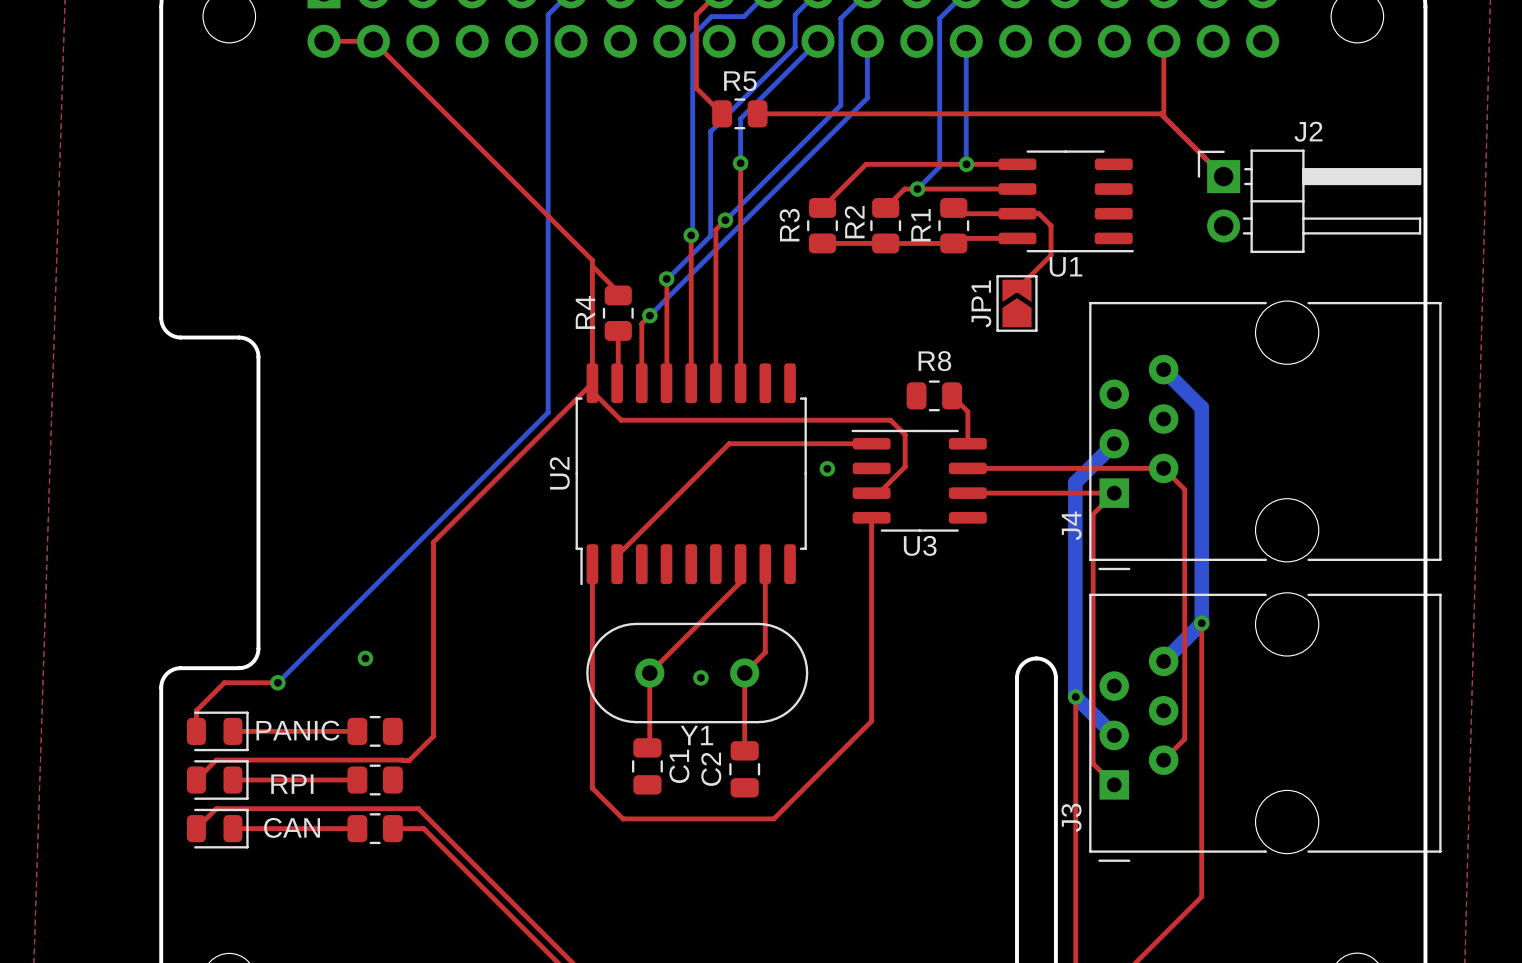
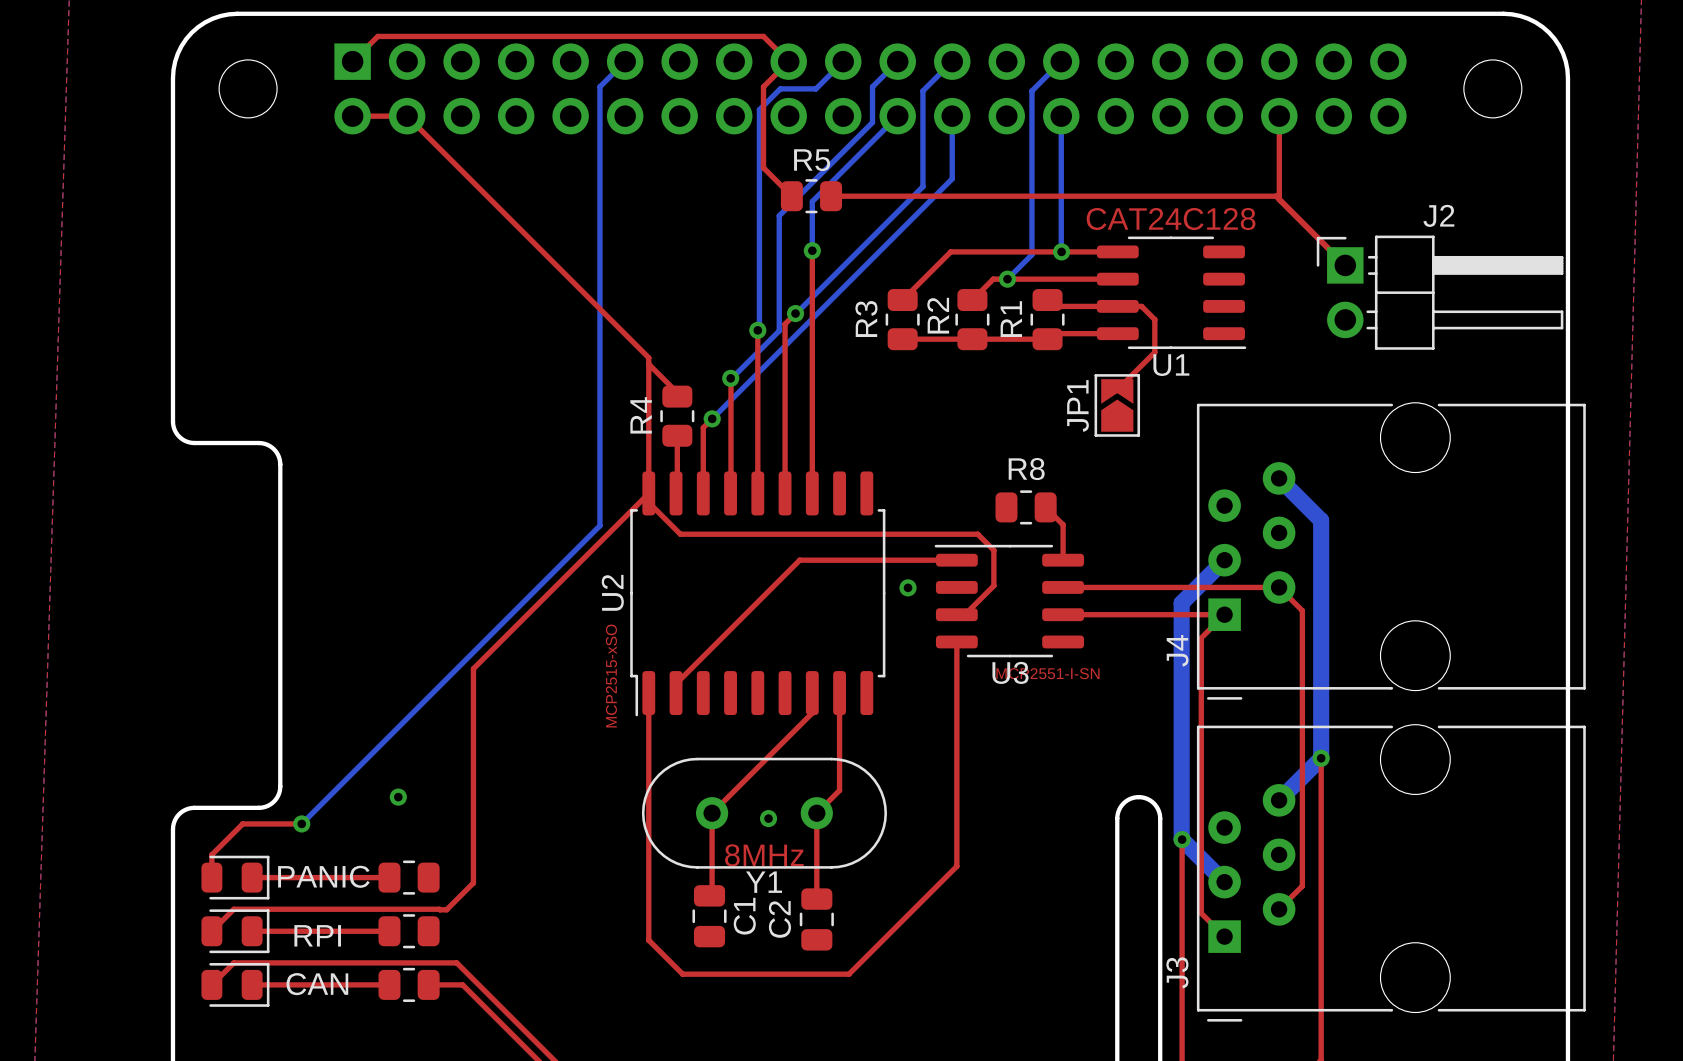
U1 value: none -> CAT24C128 (1171, 219)
U3 value: none -> MCP2551-I-SN (1047, 673)
U2 value: none -> MCP2515-xSO (611, 676)
Y1 value: none -> 8MHz (764, 855)

